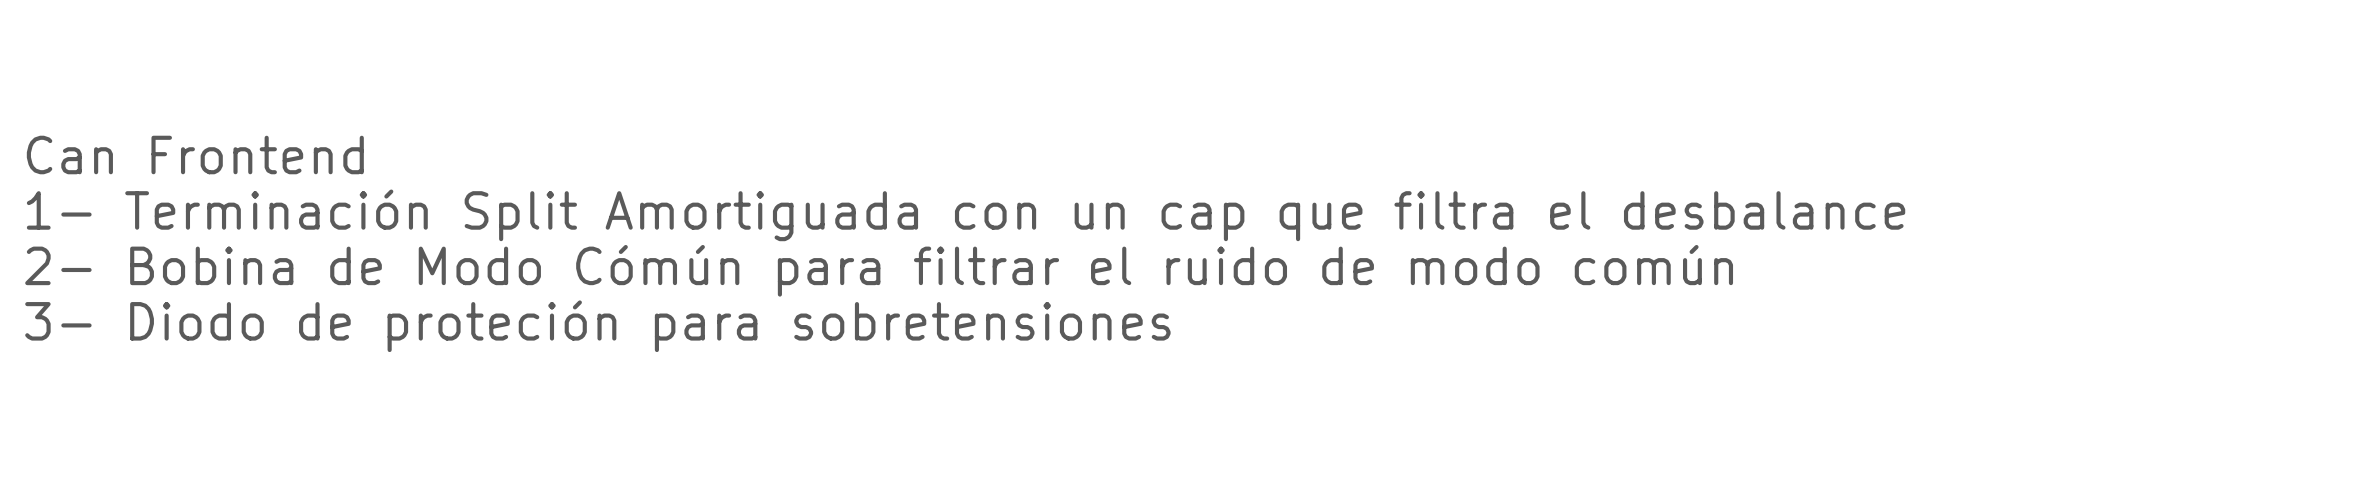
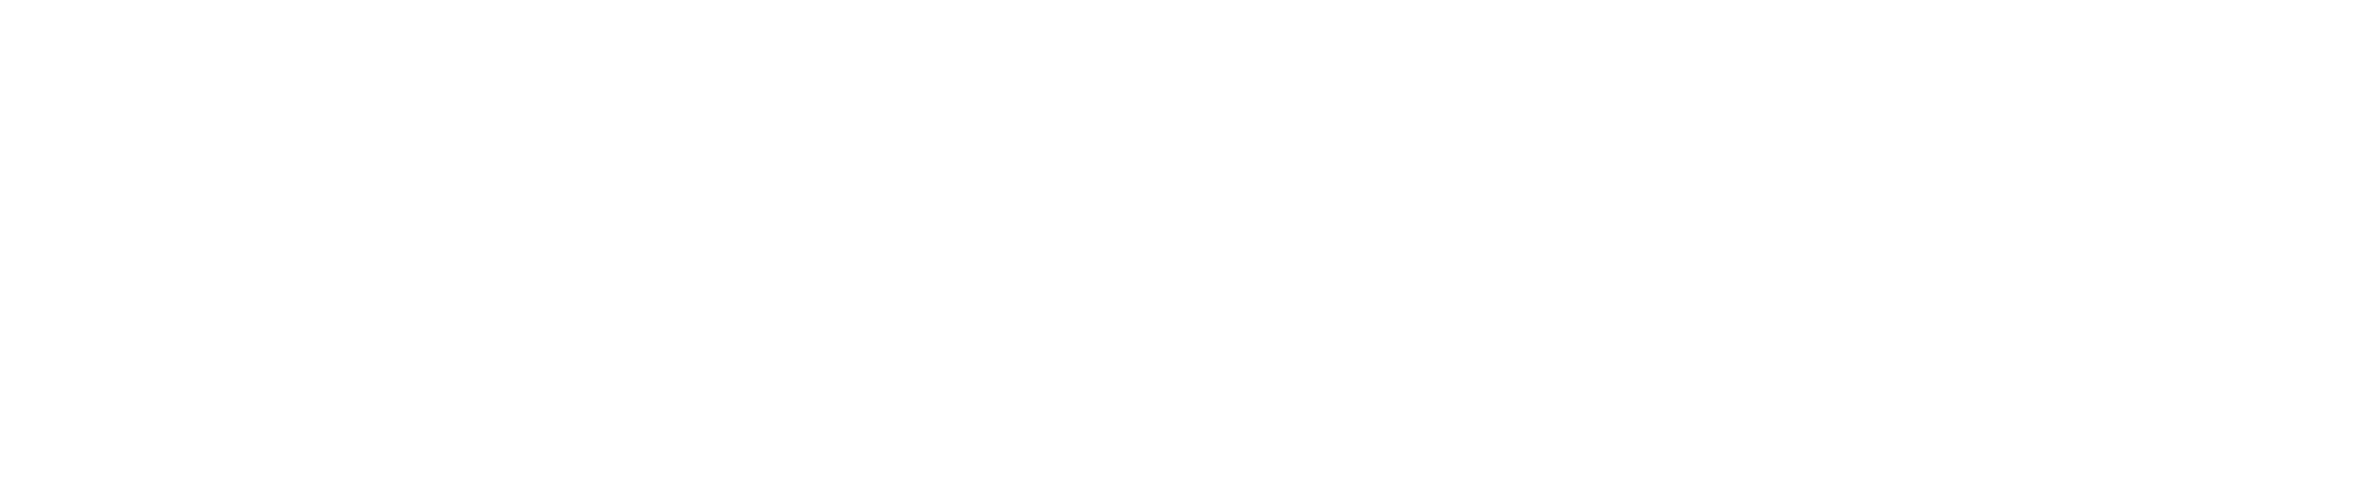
text: Can Frontend (195, 155) -> none
text: 1- Terminación Split Amortiguada con un cap que filtra el desbalance (966, 215) -> none
text: 2- Bobina de Modo Cómún para filtrar el ruido de modo común (879, 270) -> none
text: 3- Diodo de proteción para sobretensiones (597, 326) -> none

